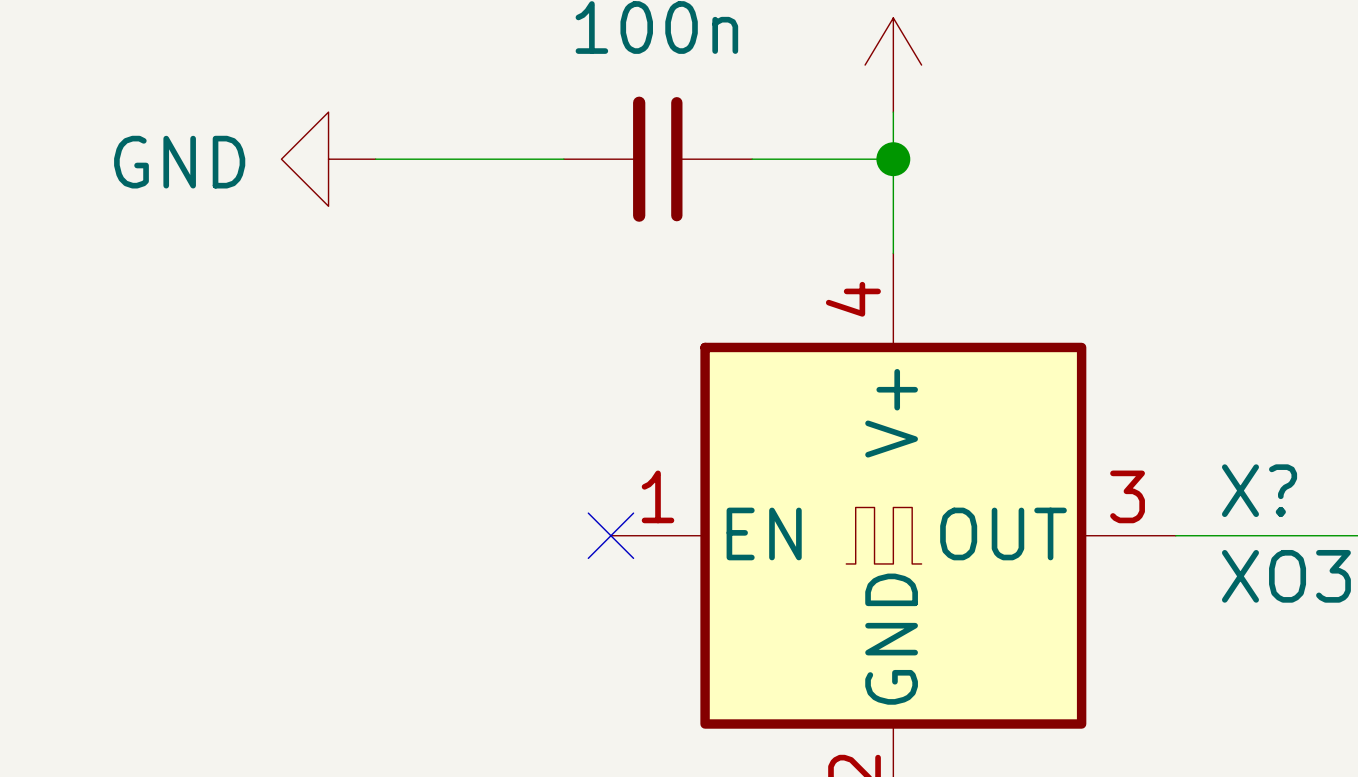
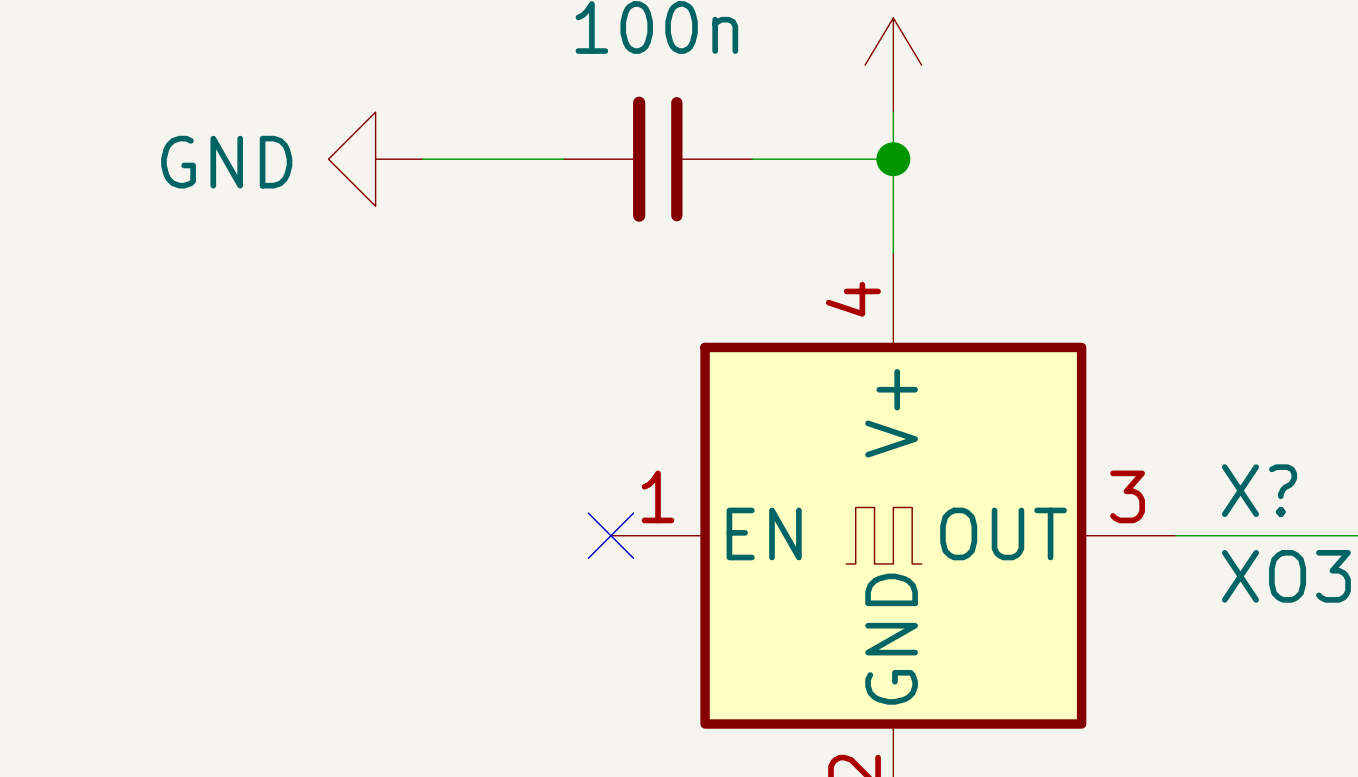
power symbol position: GND (328, 159) -> GND (375, 159)

